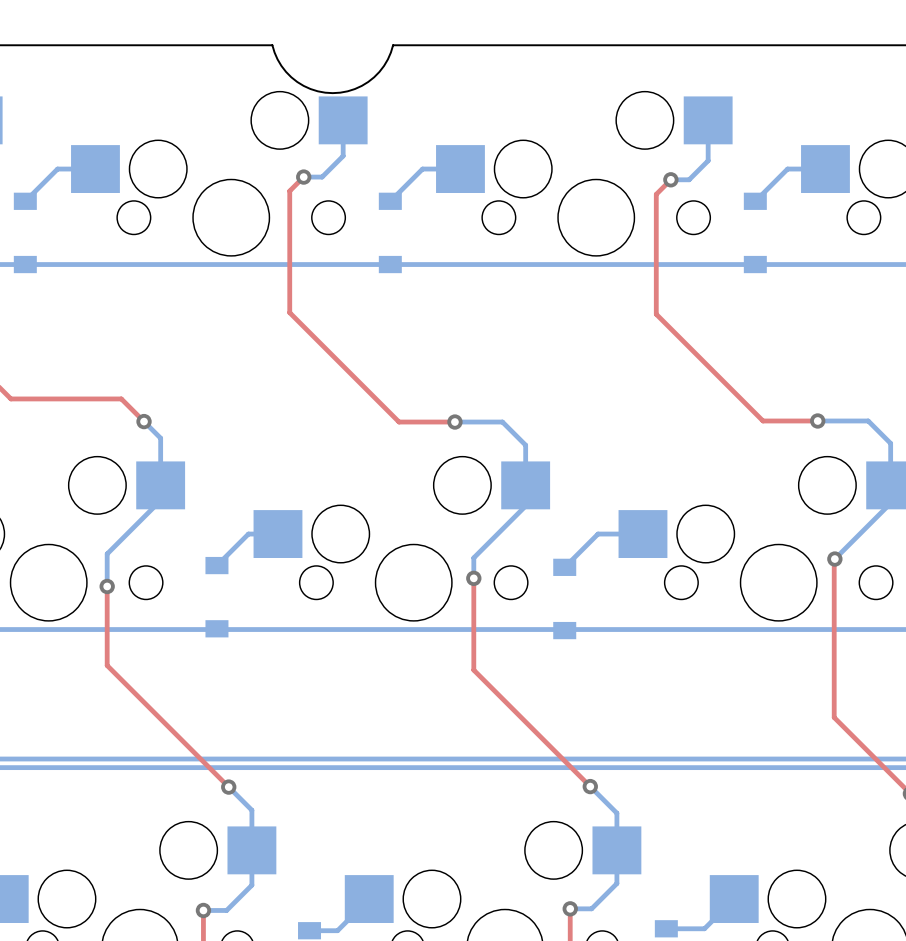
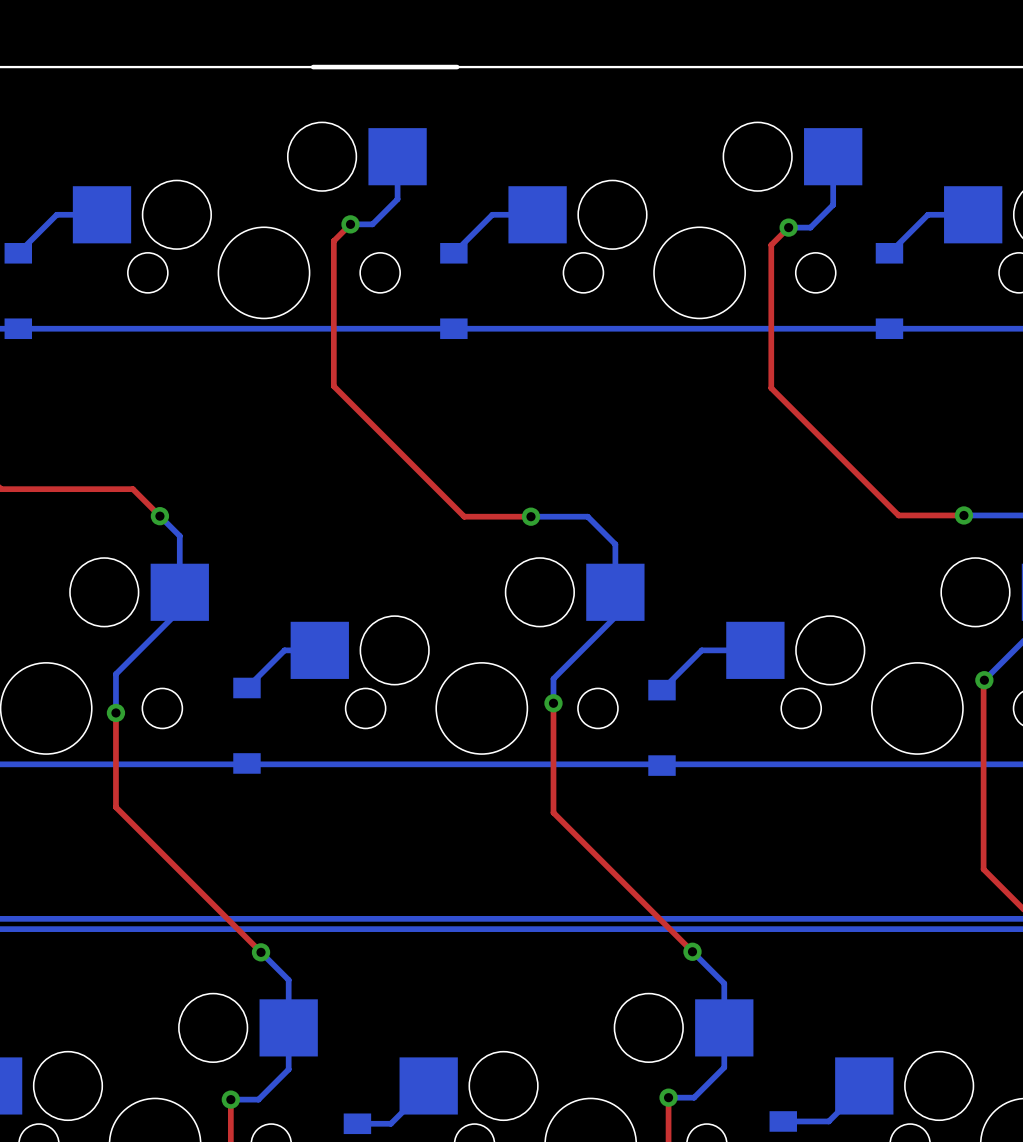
board edge: (272, 45) (277, 59) (291, 77) (310, 89) (332, 93) (354, 89) (374, 77) (384, 65) (393, 45) -> (313, 67) (457, 67)

